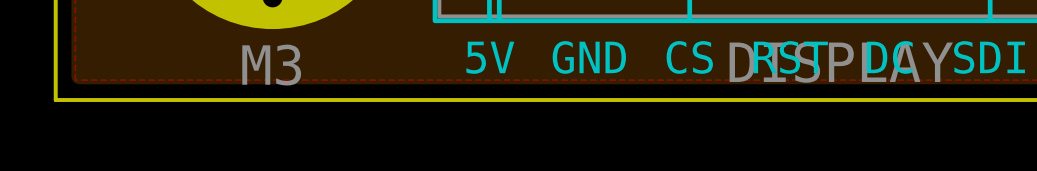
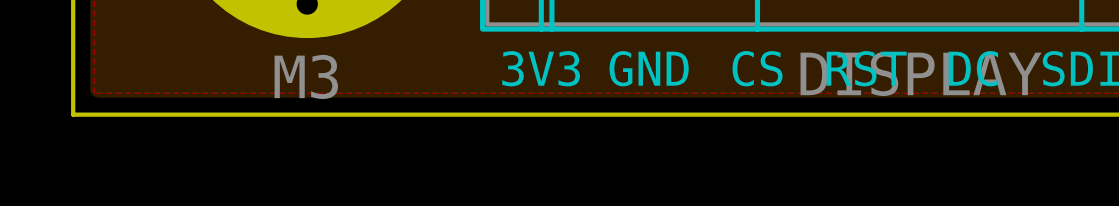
text: 5V (490, 57) -> 3V3 (541, 68)

